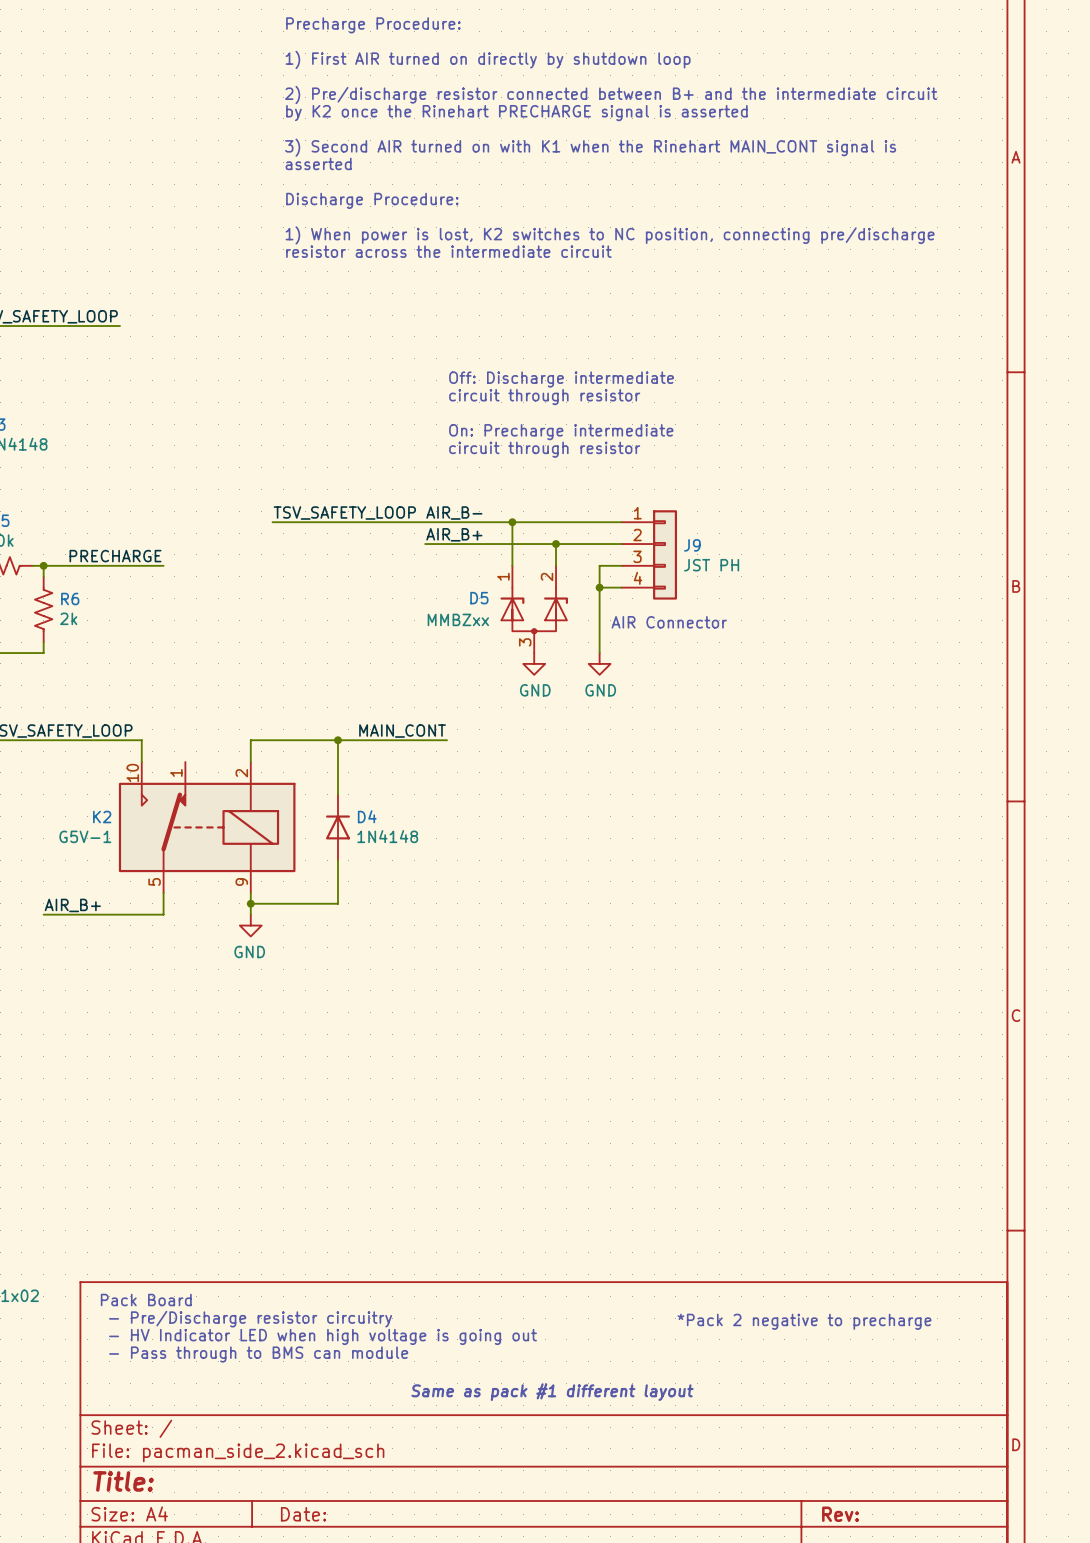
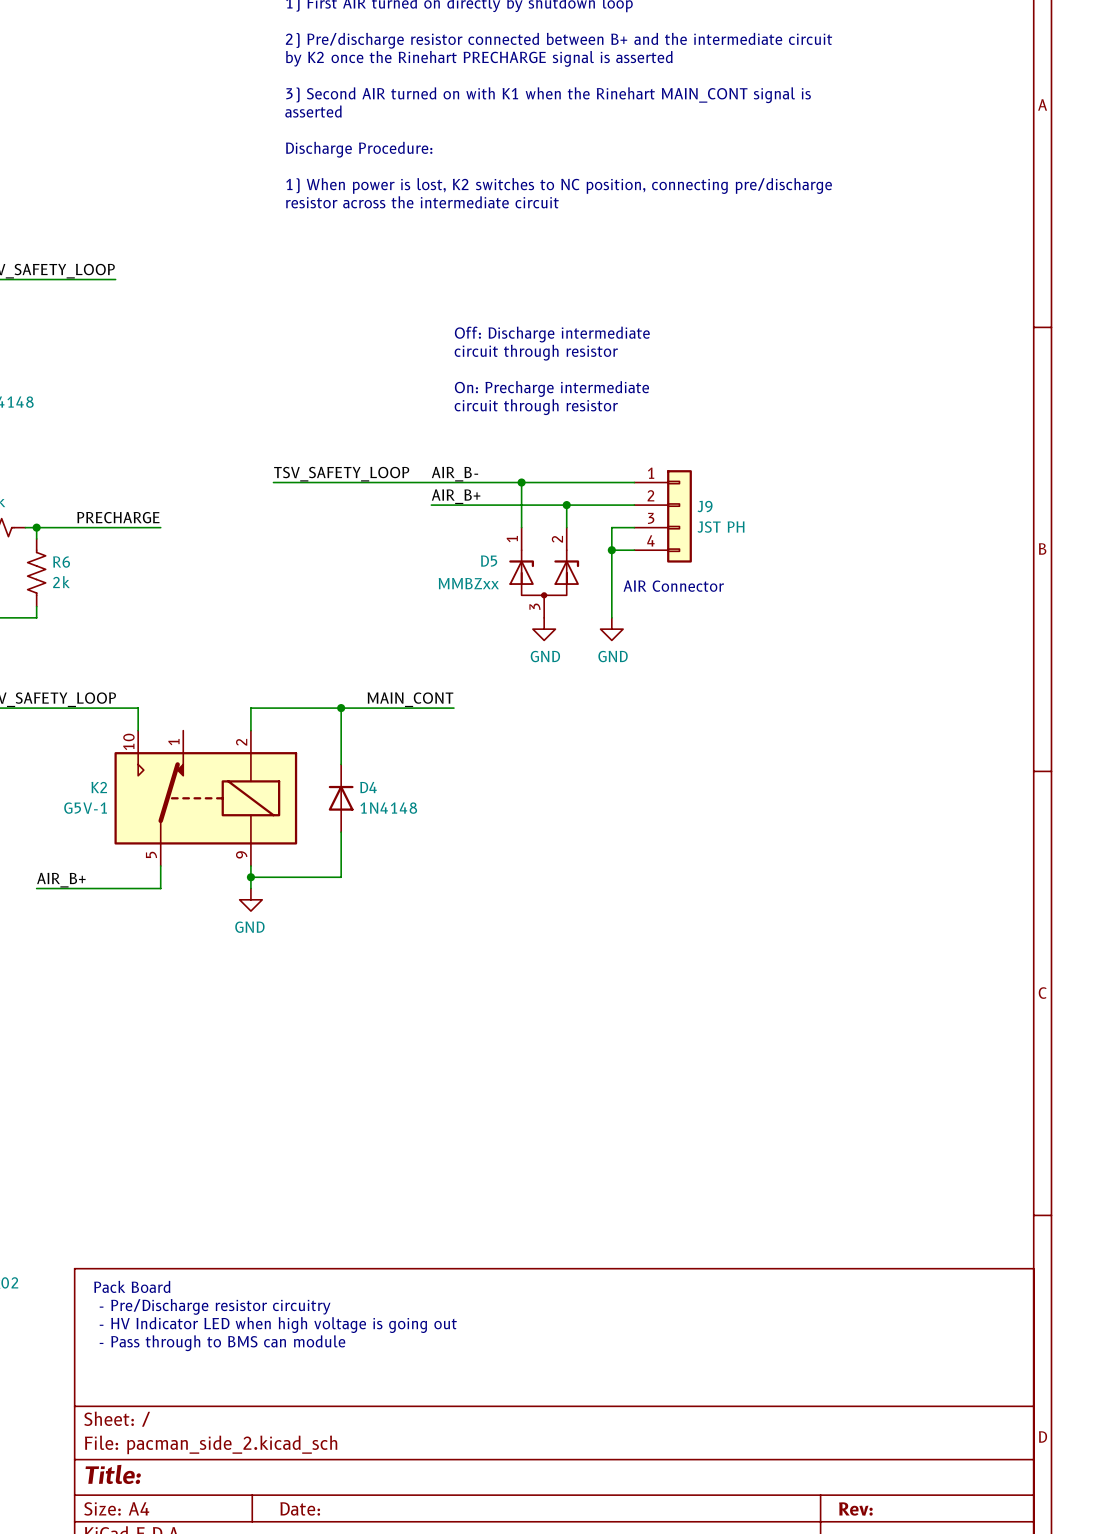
text: *Pack 2 negative to precharge (804, 1321) -> none
text: Same as pack #1 different layout (552, 1392) -> none

